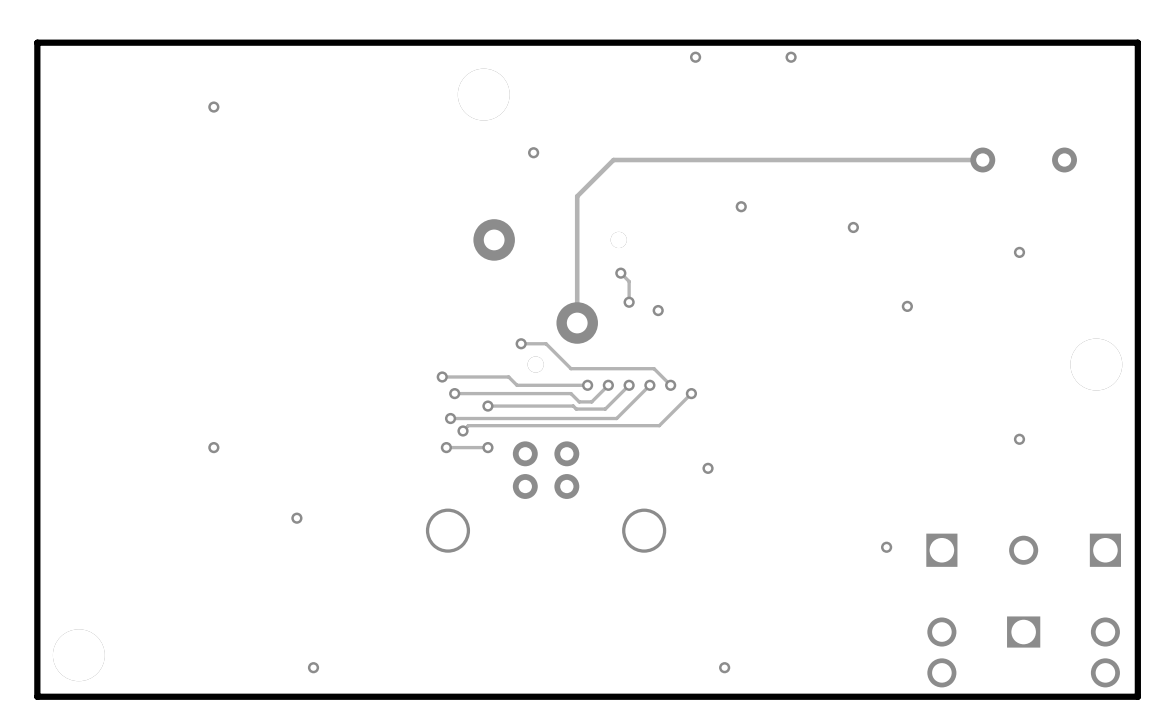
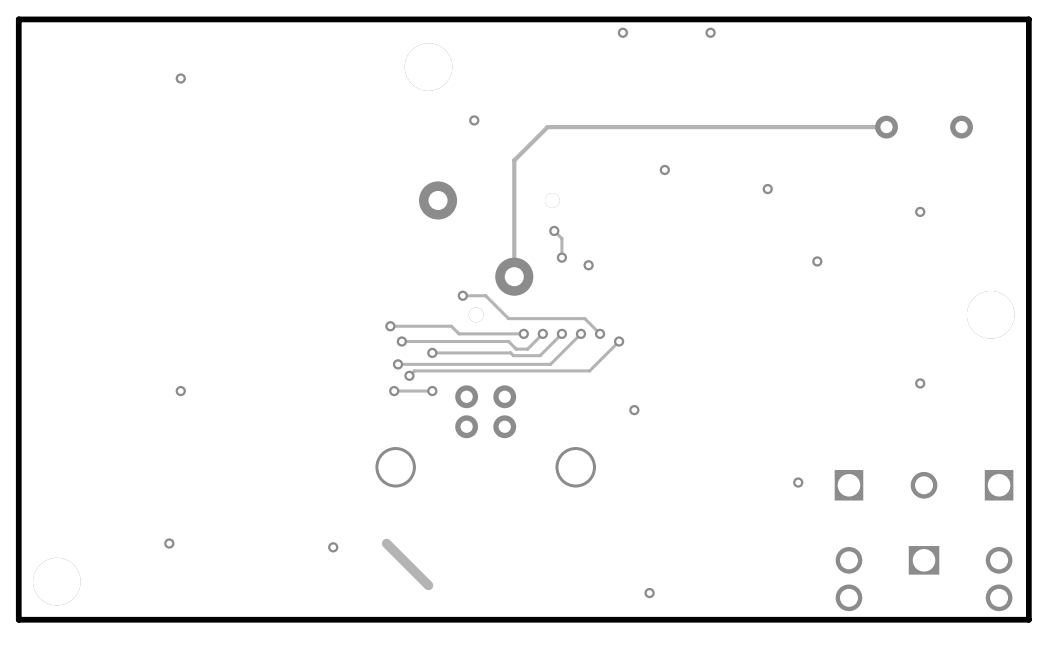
via: (296, 518) -> none
via: none -> (169, 543)
track: none -> (386, 543) (428, 585)
via: none -> (333, 547)
via: (313, 667) -> none

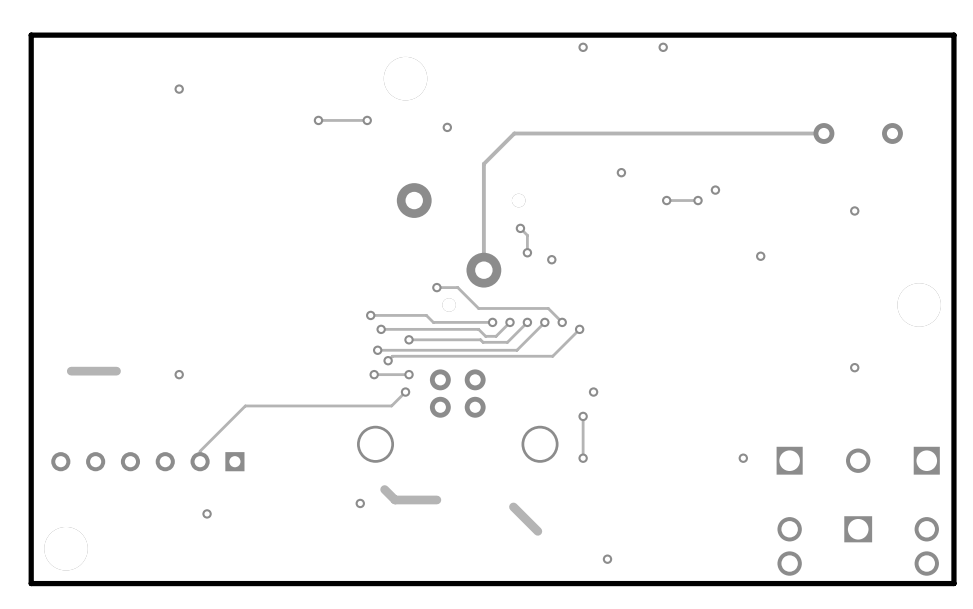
via: none -> (318, 120)
track: none -> (367, 120) (318, 120)
via: none -> (367, 120)
via: none -> (666, 200)
track: none -> (698, 200) (666, 200)
via: none -> (698, 200)
track: none -> (116, 371) (71, 371)
track: none -> (405, 392) (391, 405) (245, 405) (200, 451) (200, 461)
via: none -> (405, 392)
track: none -> (583, 416) (583, 458)
via: none -> (583, 416)
via: none -> (583, 458)
part: none -> (147, 461)
track: none -> (384, 489) (395, 499) (436, 499)
track: none -> (513, 506) (537, 531)
via position: (169, 543) -> (207, 513)
track: (386, 543) (428, 585) -> none
via position: (333, 547) -> (360, 503)

